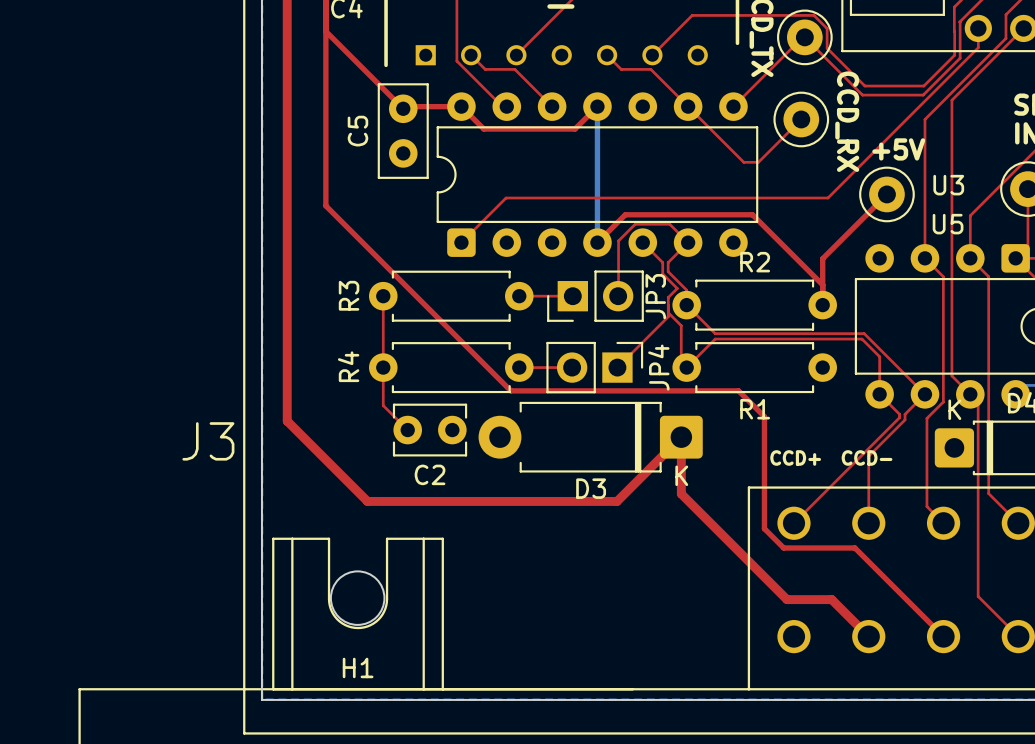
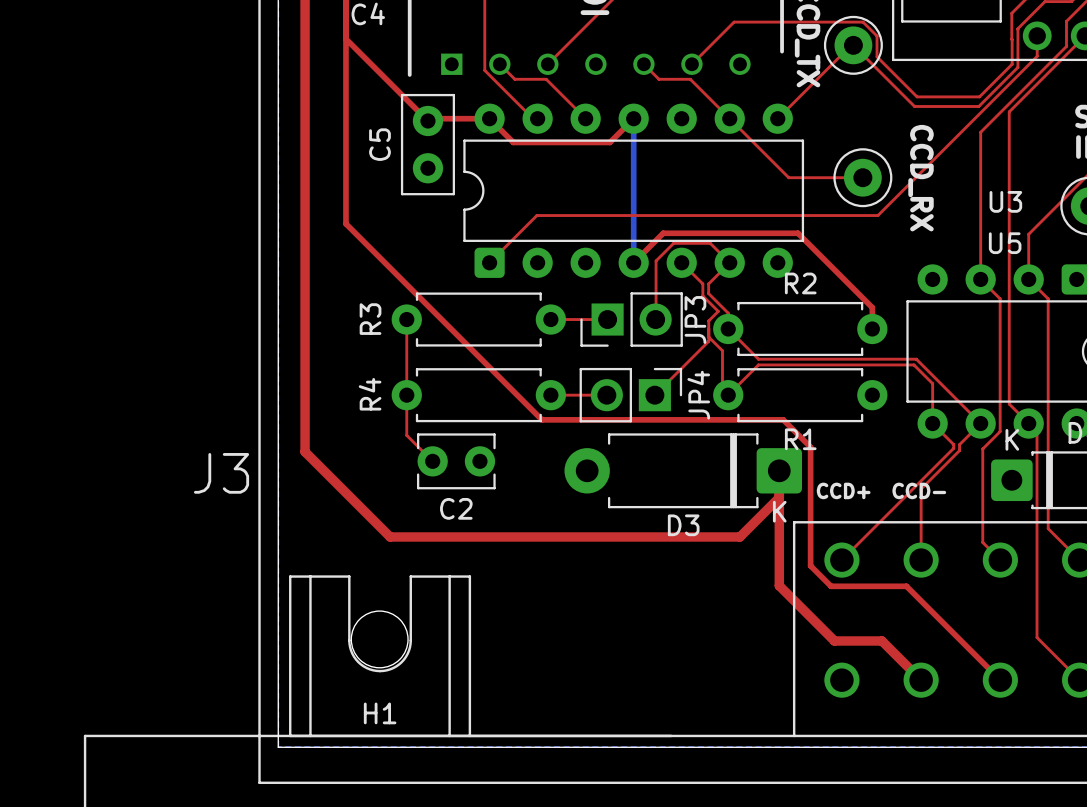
top track: (801, 119) (758, 162) -> (862, 177) (804, 177)
part: (801, 119) -> none
text: CCD_RX (847, 121) -> none
text: +5V (898, 149) -> CCD_RX (921, 178)
part: none -> (862, 177)
top track: (886, 194) (822, 258) (822, 284) -> none
part: (886, 194) -> none
D3 position: (590, 437) -> (683, 470)
top track: none -> (779, 470) (779, 585)
top track: (617, 501) (681, 437) (681, 493) (734, 547) -> (654, 536) (739, 536) (779, 497)

